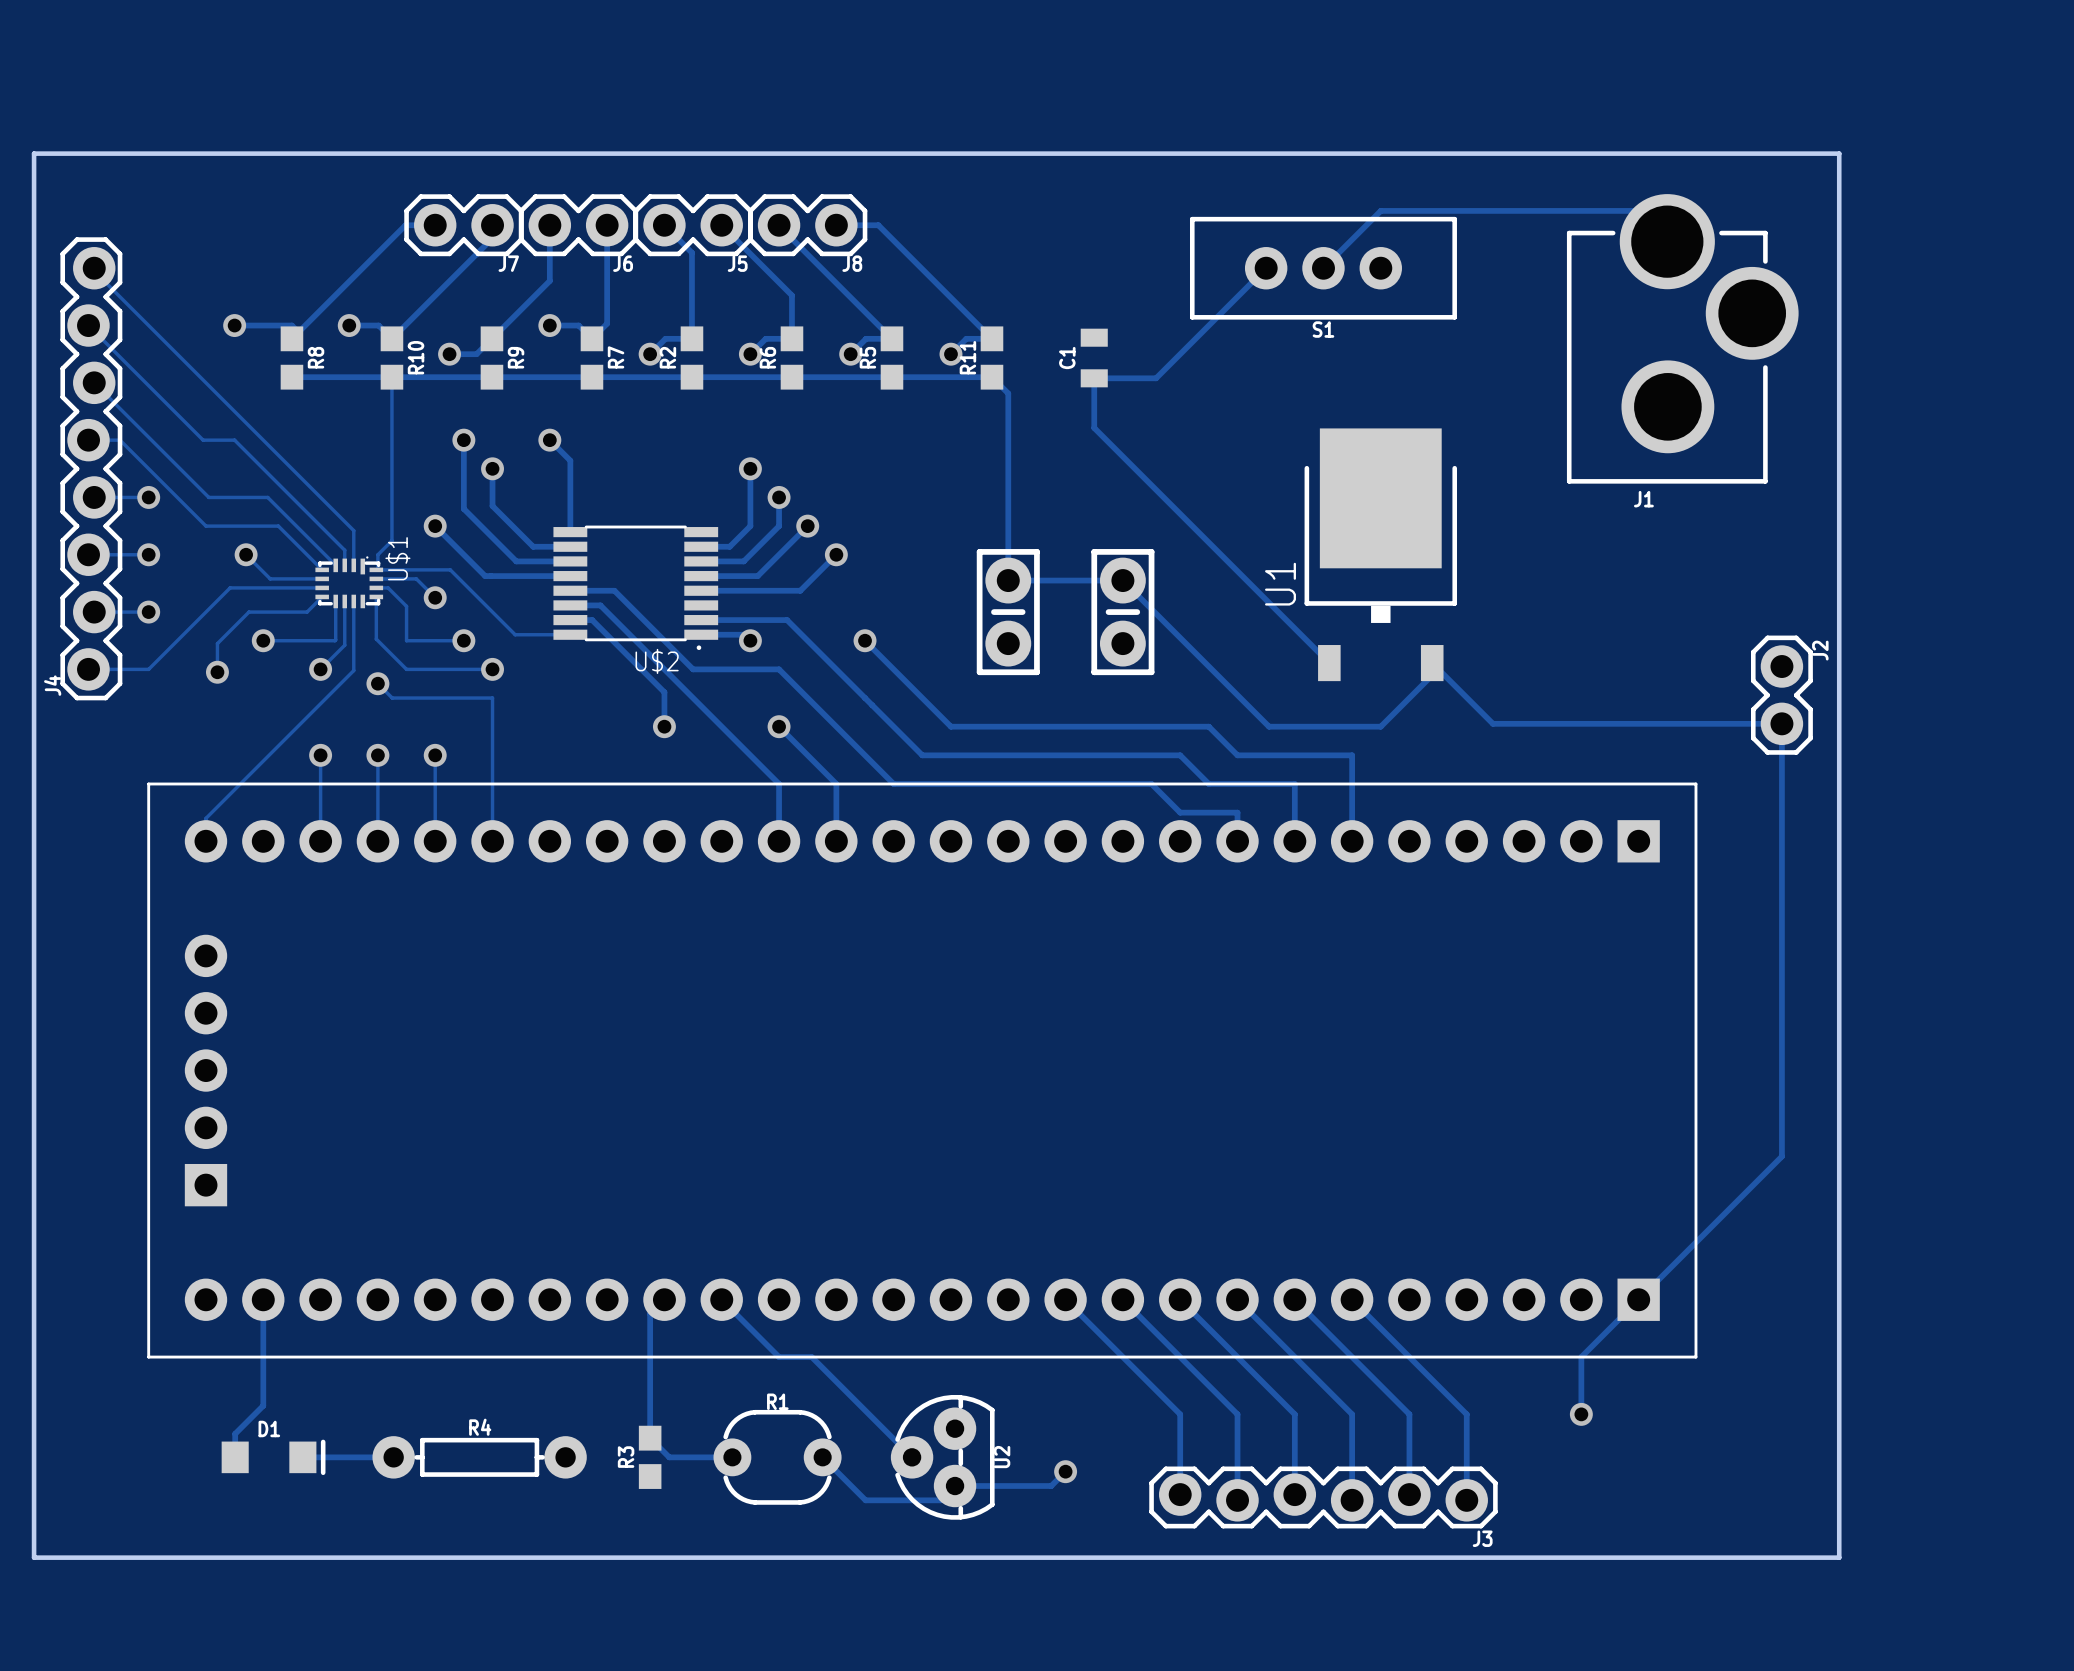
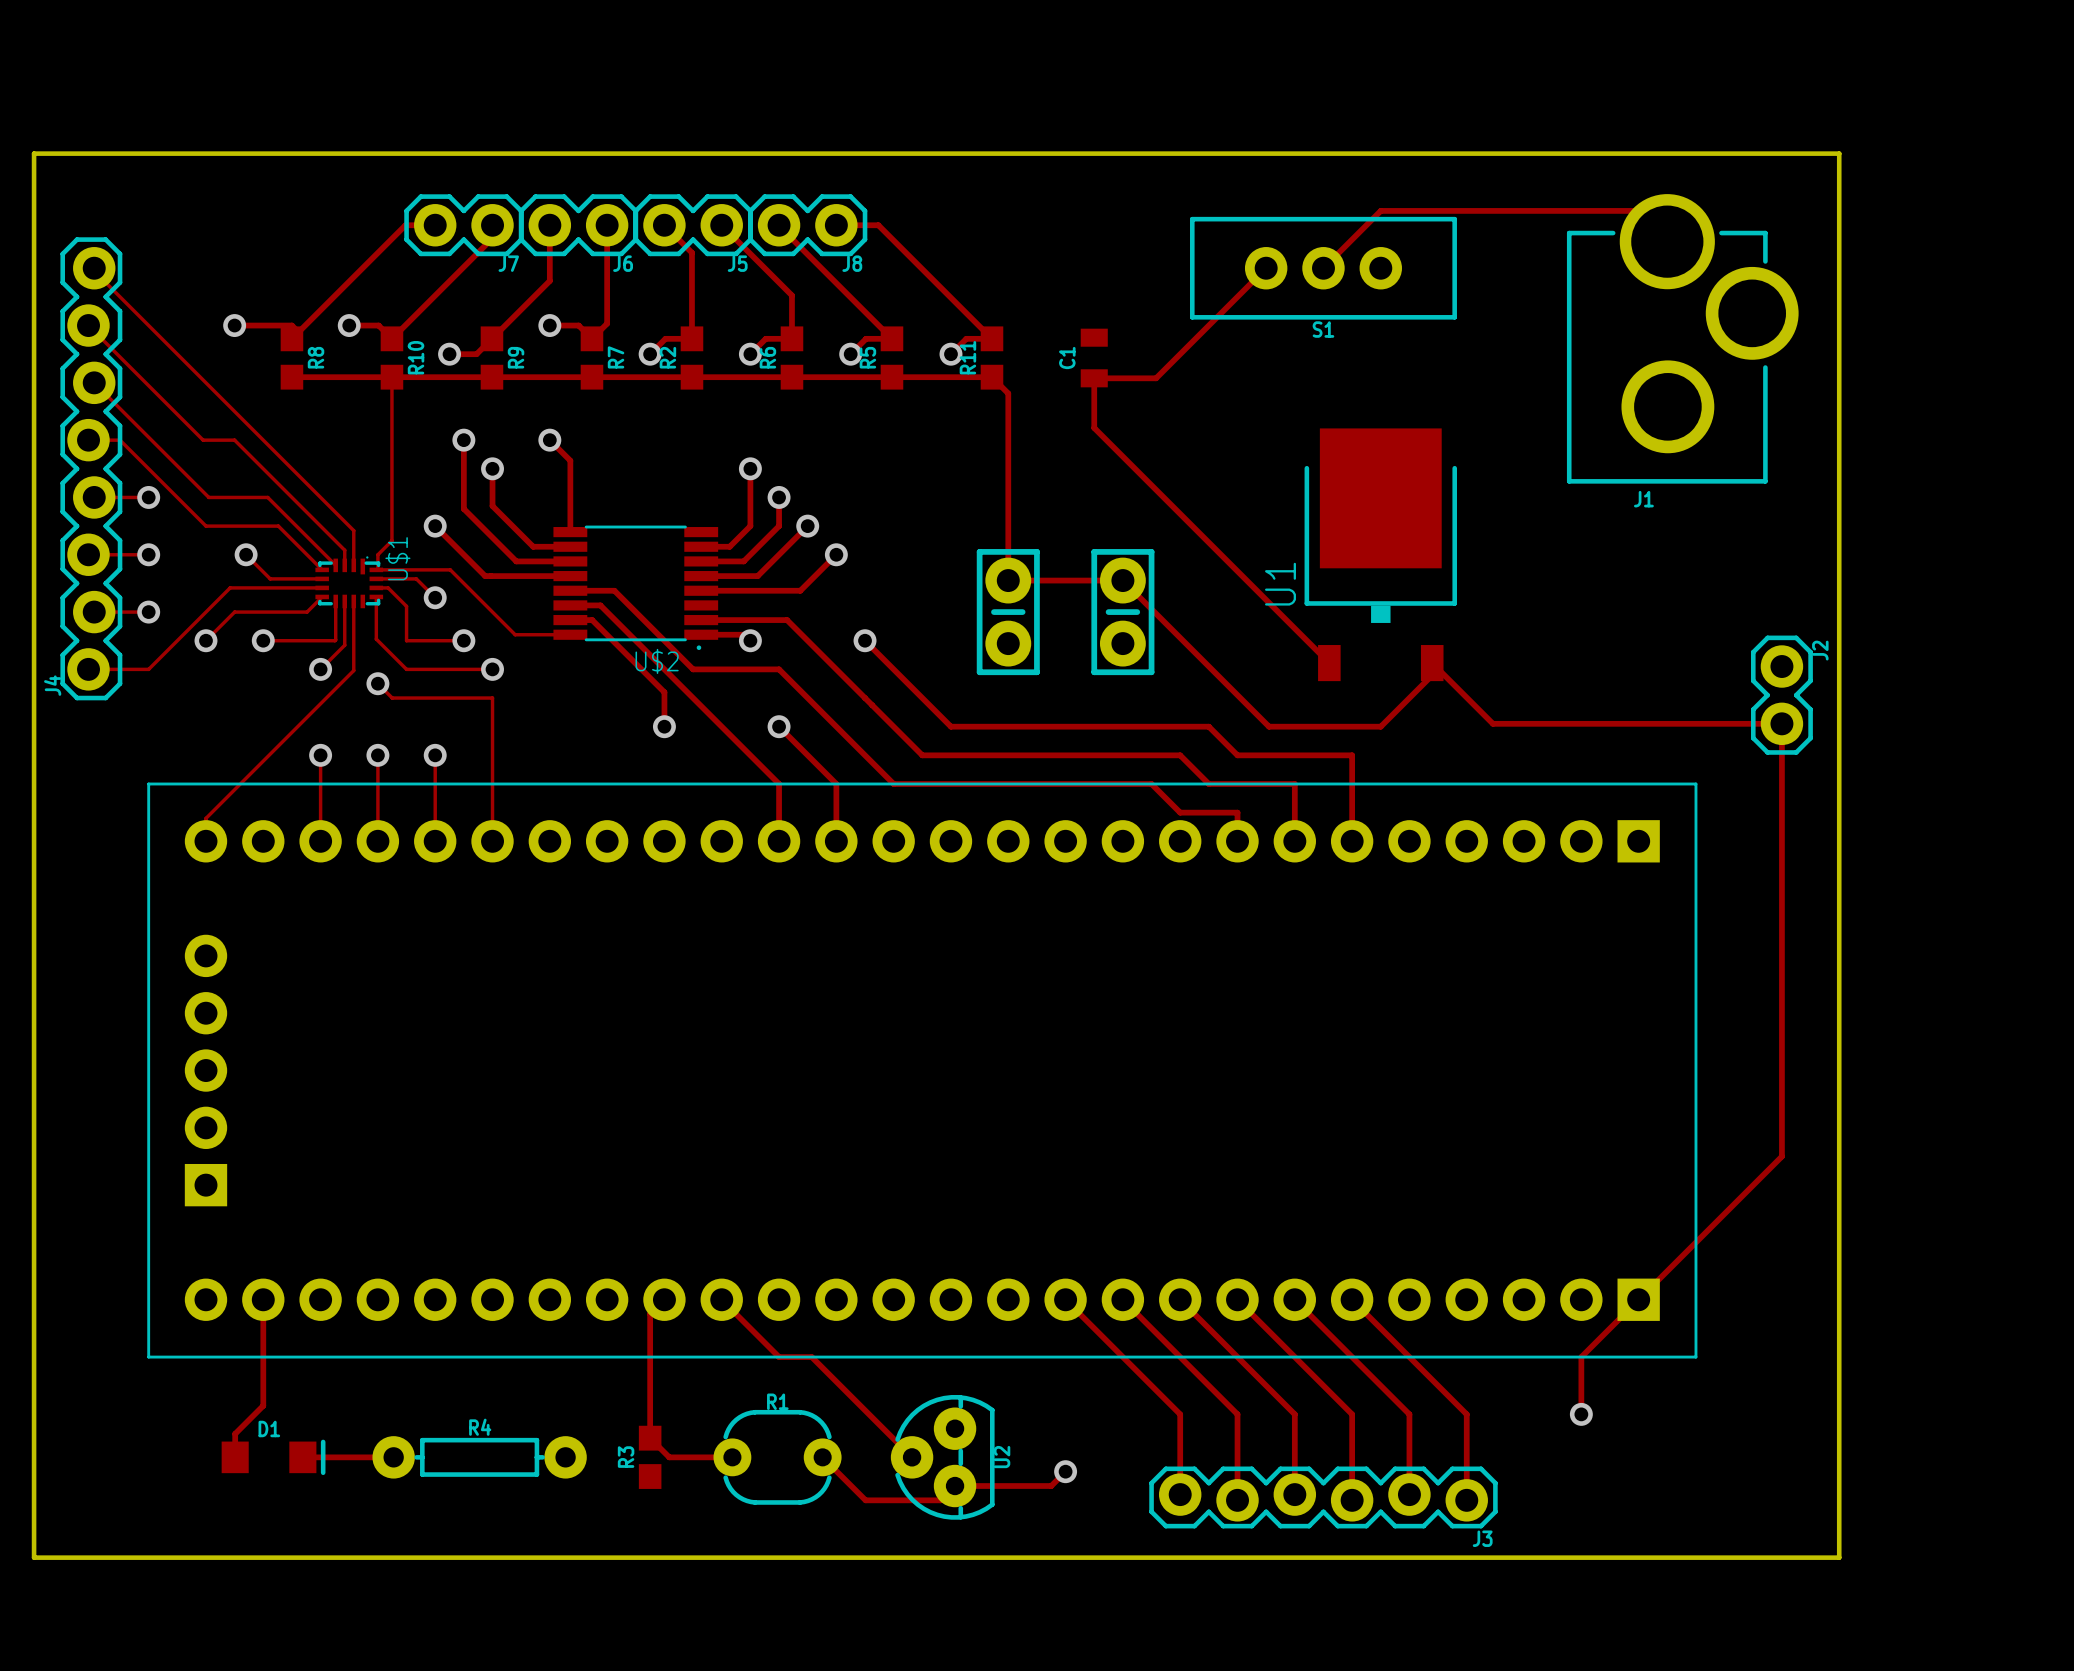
track: (248, 612) (217, 643) (217, 672) -> (248, 612) (234, 612) (205, 640)
via position: (217, 672) -> (205, 640)

